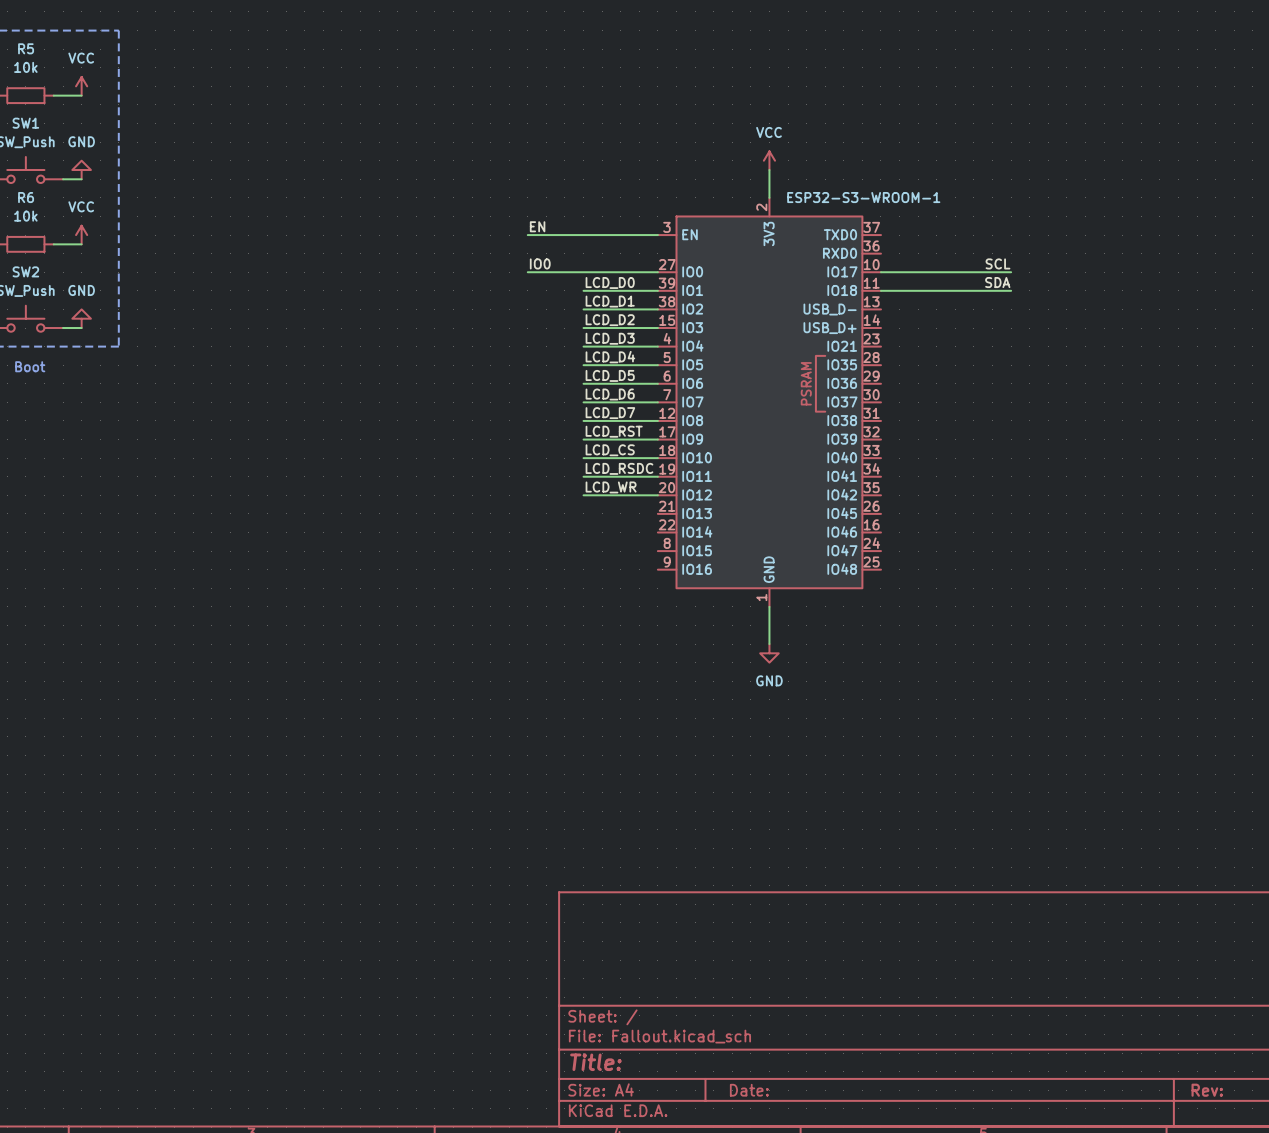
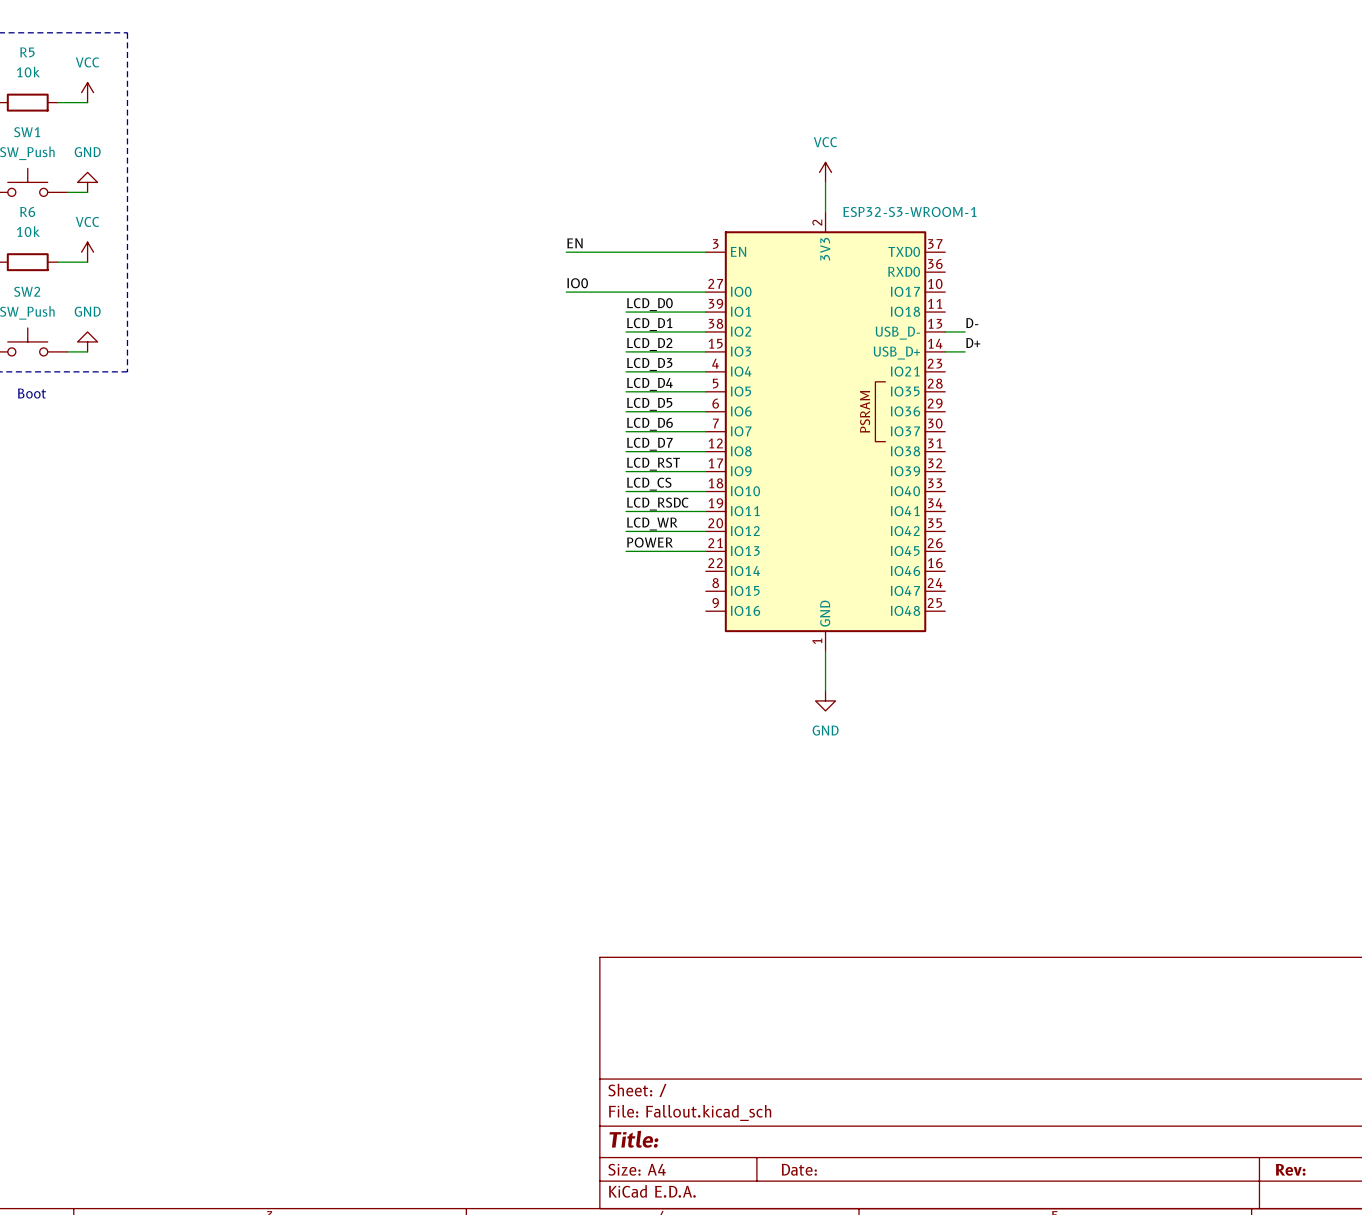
label: SCL (997, 263) -> none
wire: (880, 272) (1011, 272) -> none
label: SDA (997, 282) -> none
wire: (880, 290) (1011, 290) -> none
label: none -> D- (972, 323)
wire: none -> (945, 331) (965, 331)
label: none -> D+ (973, 343)
wire: none -> (945, 351) (965, 351)
label: none -> POWER (650, 542)
wire: none -> (626, 551) (705, 551)

